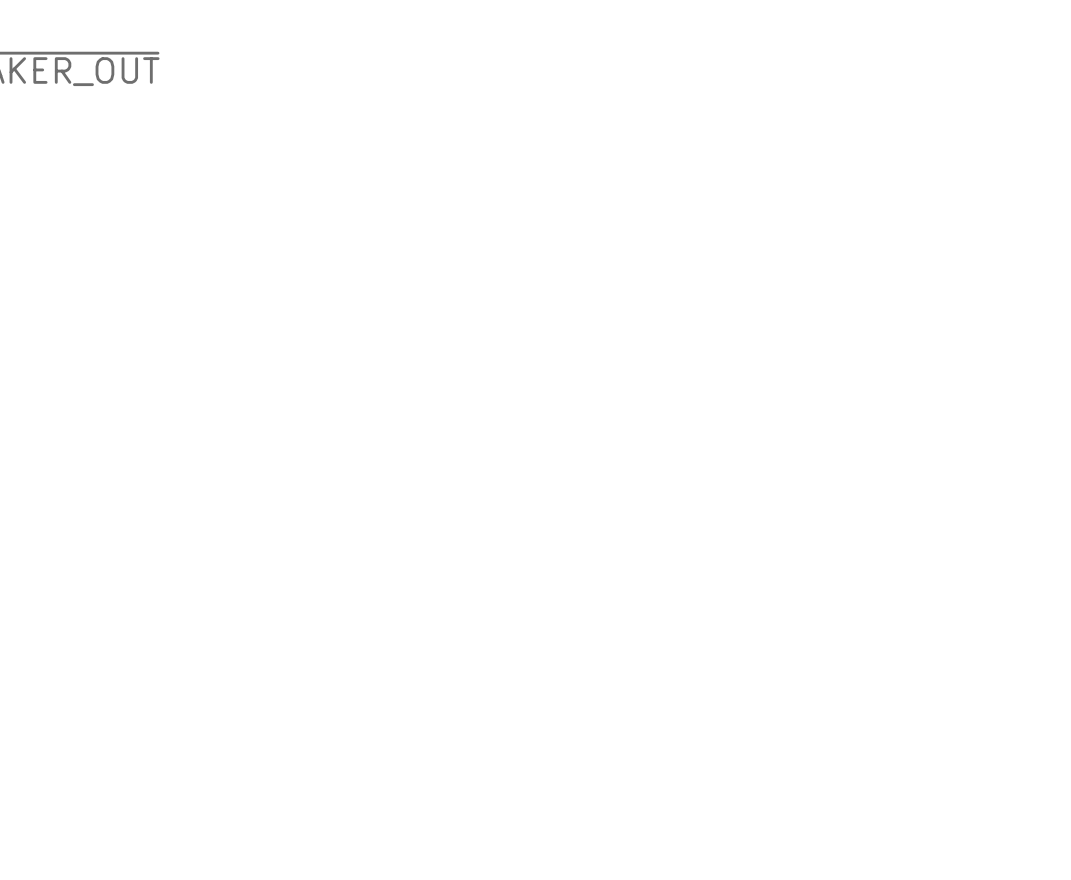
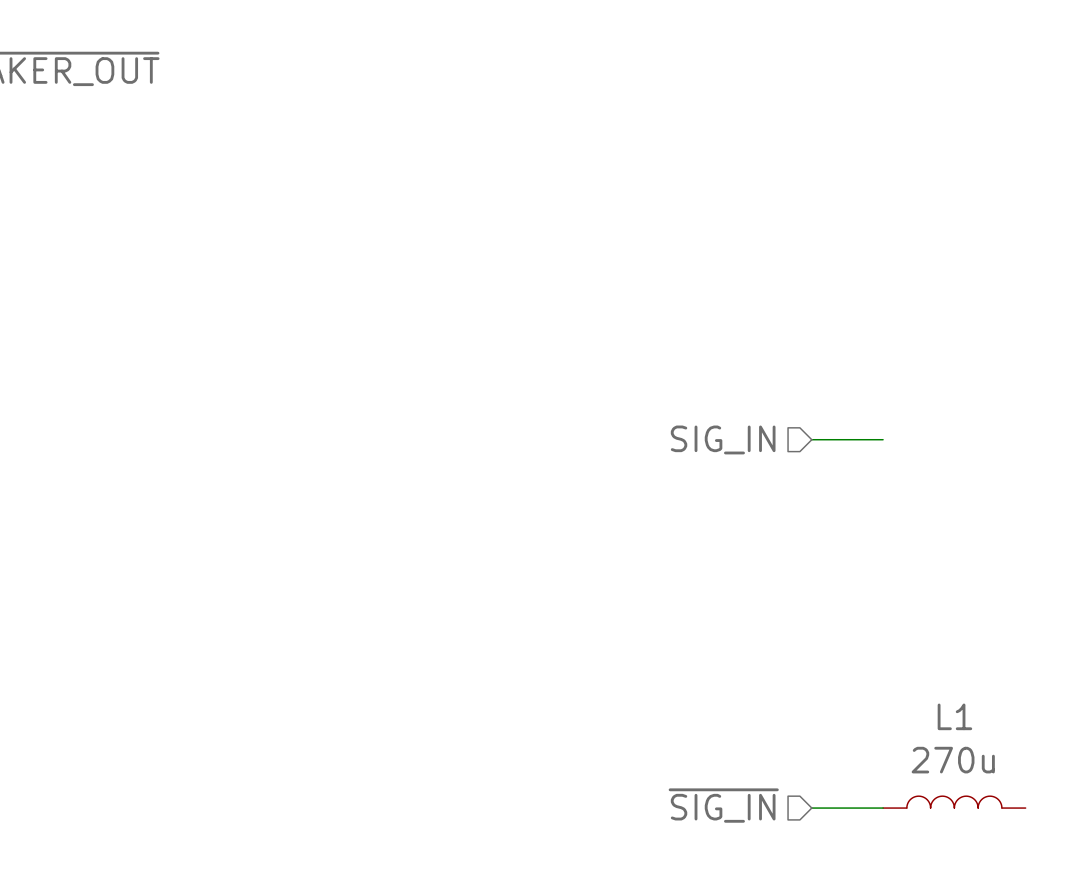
hierarchical label: none -> SIG_IN (723, 439)
wire: none -> (811, 439) (883, 439)
L1: none -> 270u (954, 802)
hierarchical label: none -> ~{SIG_IN} (723, 805)
wire: none -> (811, 808) (883, 808)

